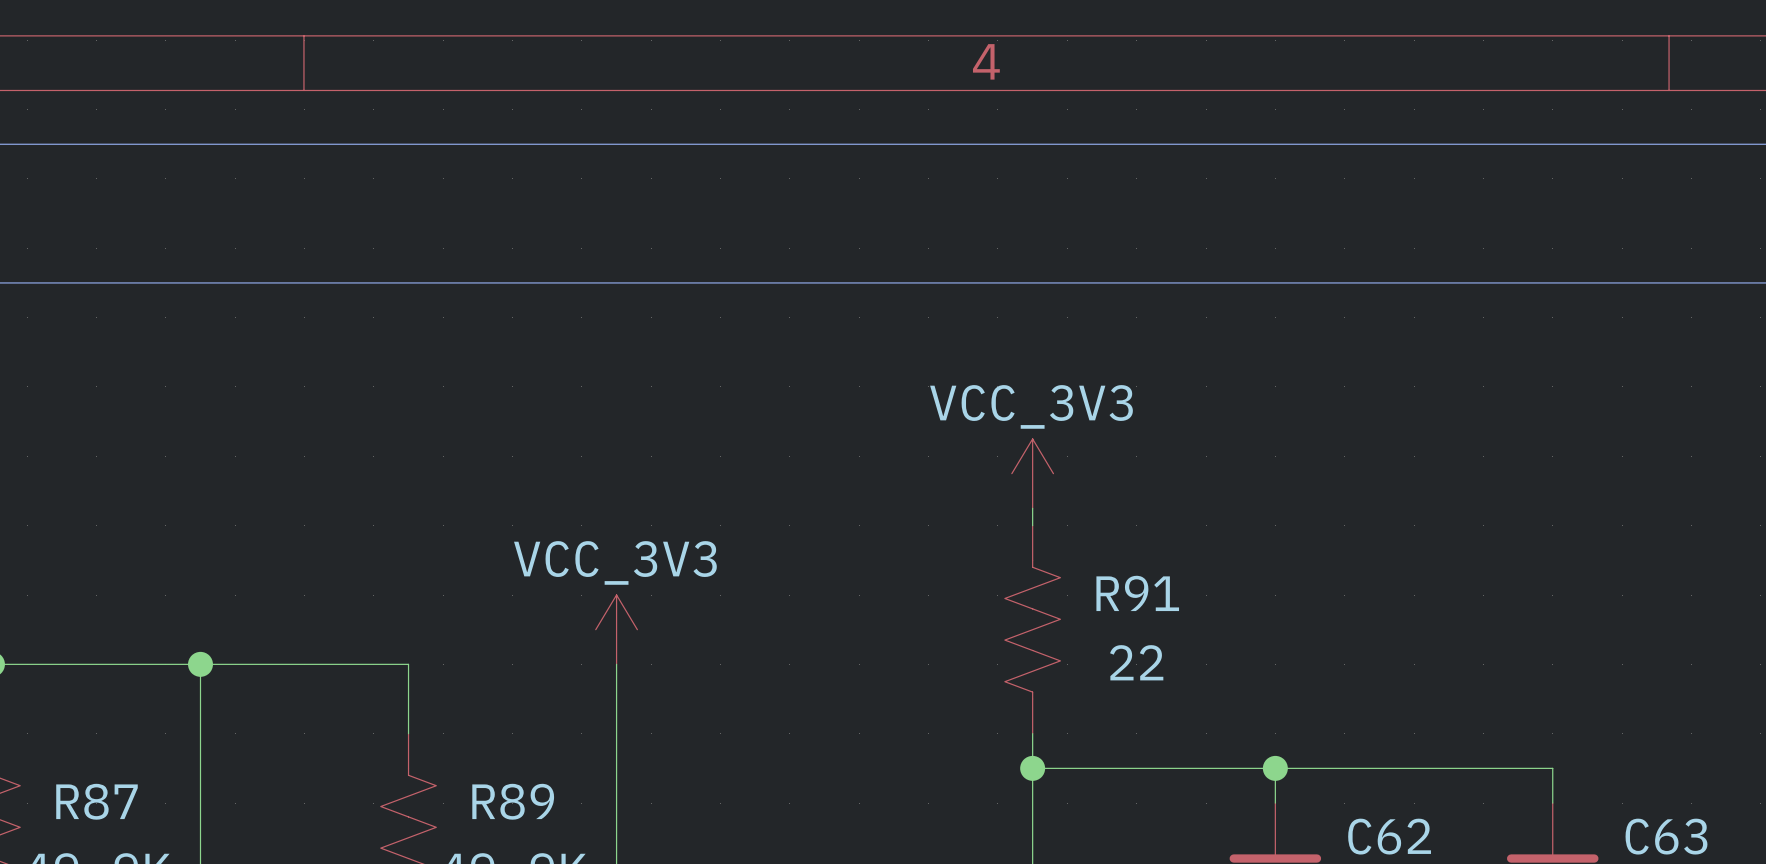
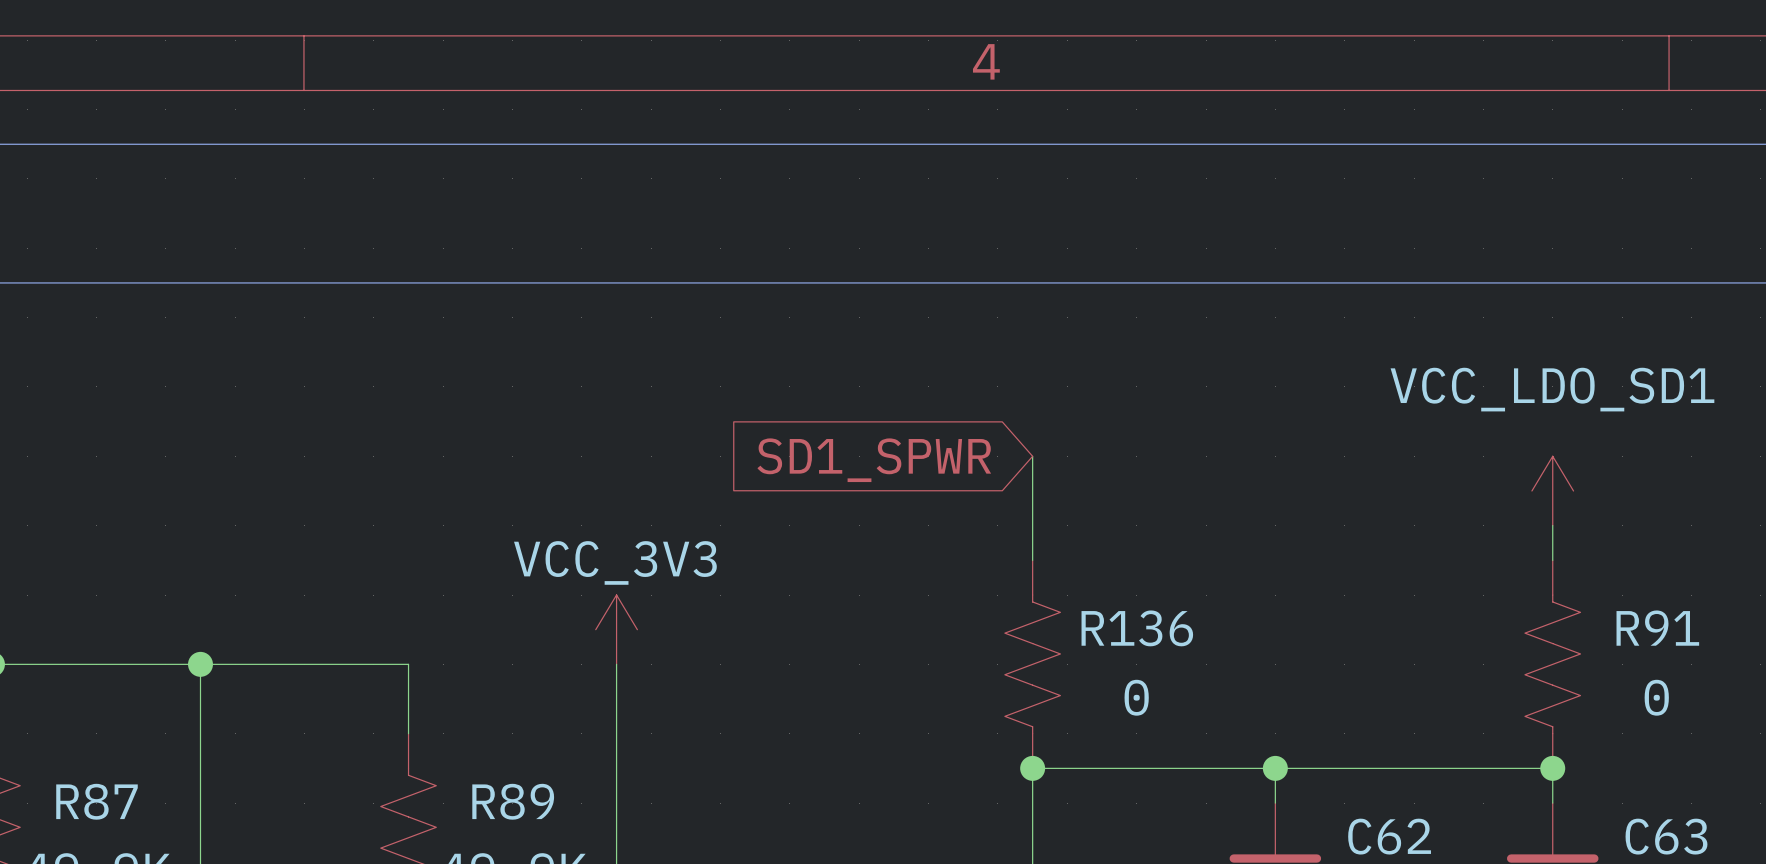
global label: none -> SD1_SPWR (874, 460)
power symbol: VCC_3V3 (1032, 473) -> none
power symbol: none -> VCC_LDO_SD1 (1552, 490)
wire: none -> (1552, 525) (1552, 560)
R91 position: (1032, 629) -> (1552, 664)
R91 value: 22 (1136, 662) -> 0 (1656, 697)
R136: none -> 0 (1032, 664)
junction: none -> (1552, 768)

